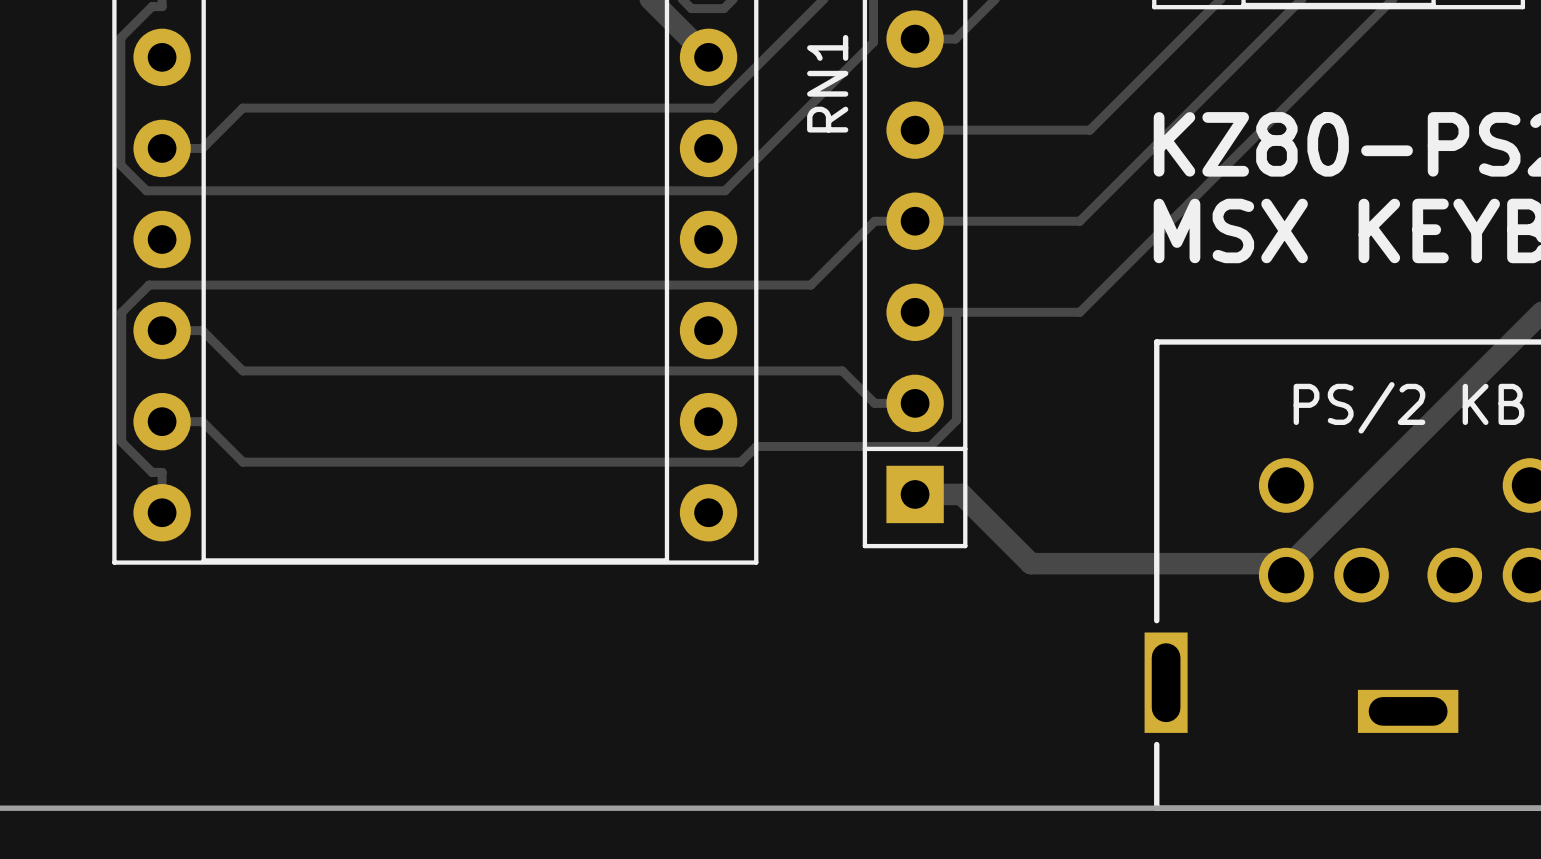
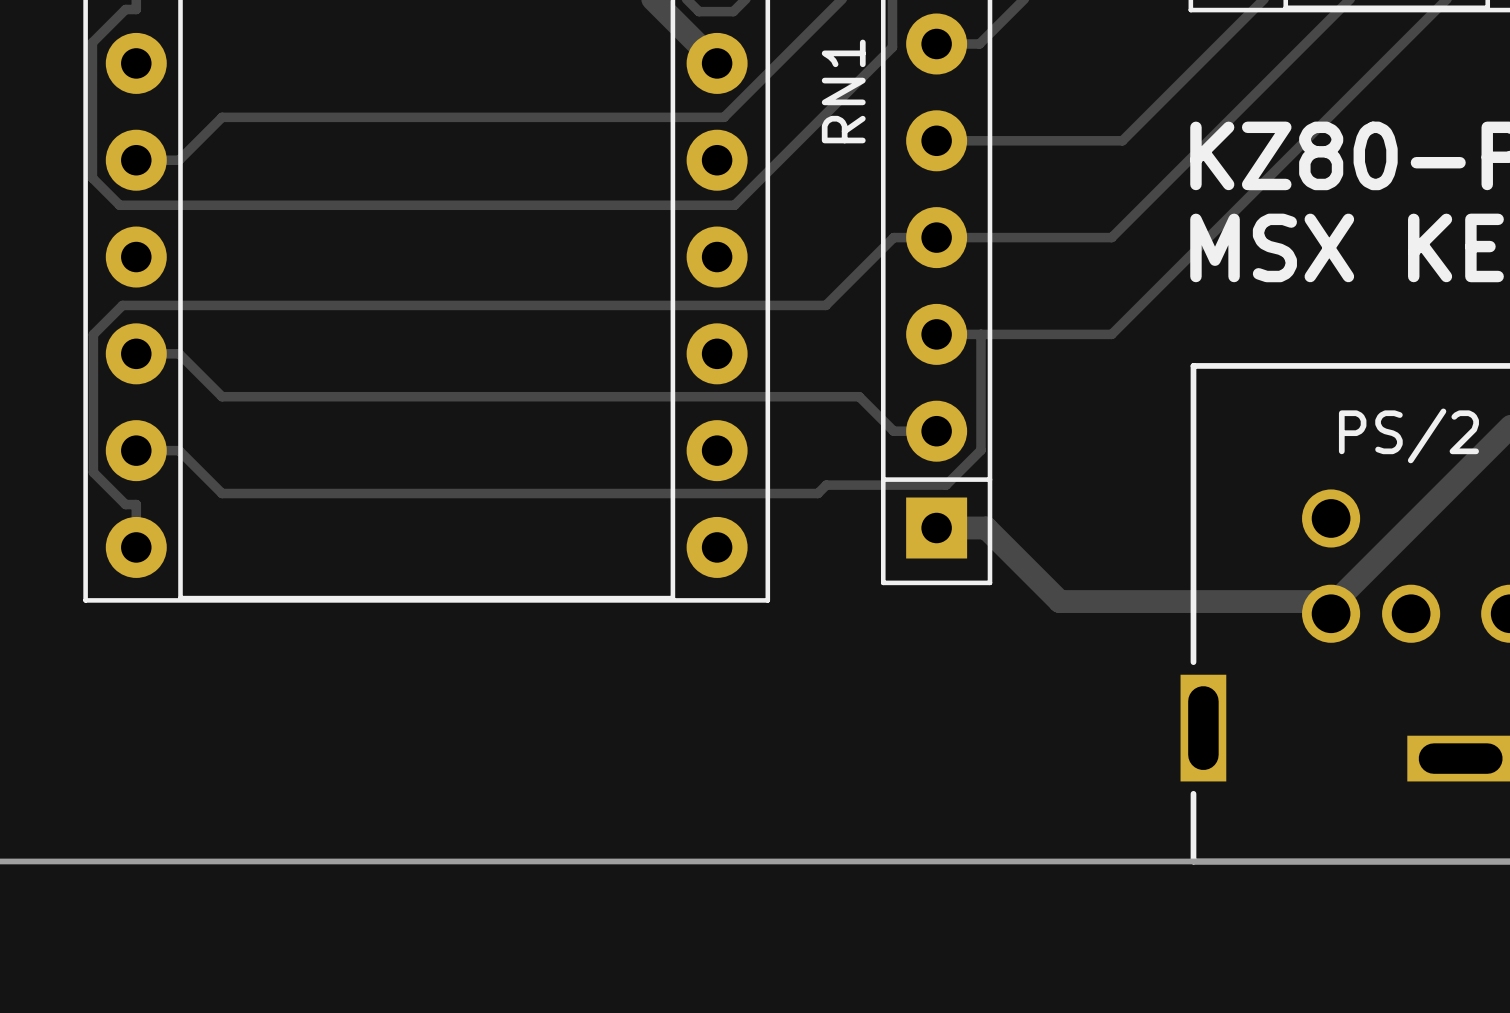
track: (956, 312) (956, 420) (930, 446) (756, 446) (740, 462) -> (980, 334) (980, 450) (946, 485) (826, 485) (817, 493) (751, 493)

